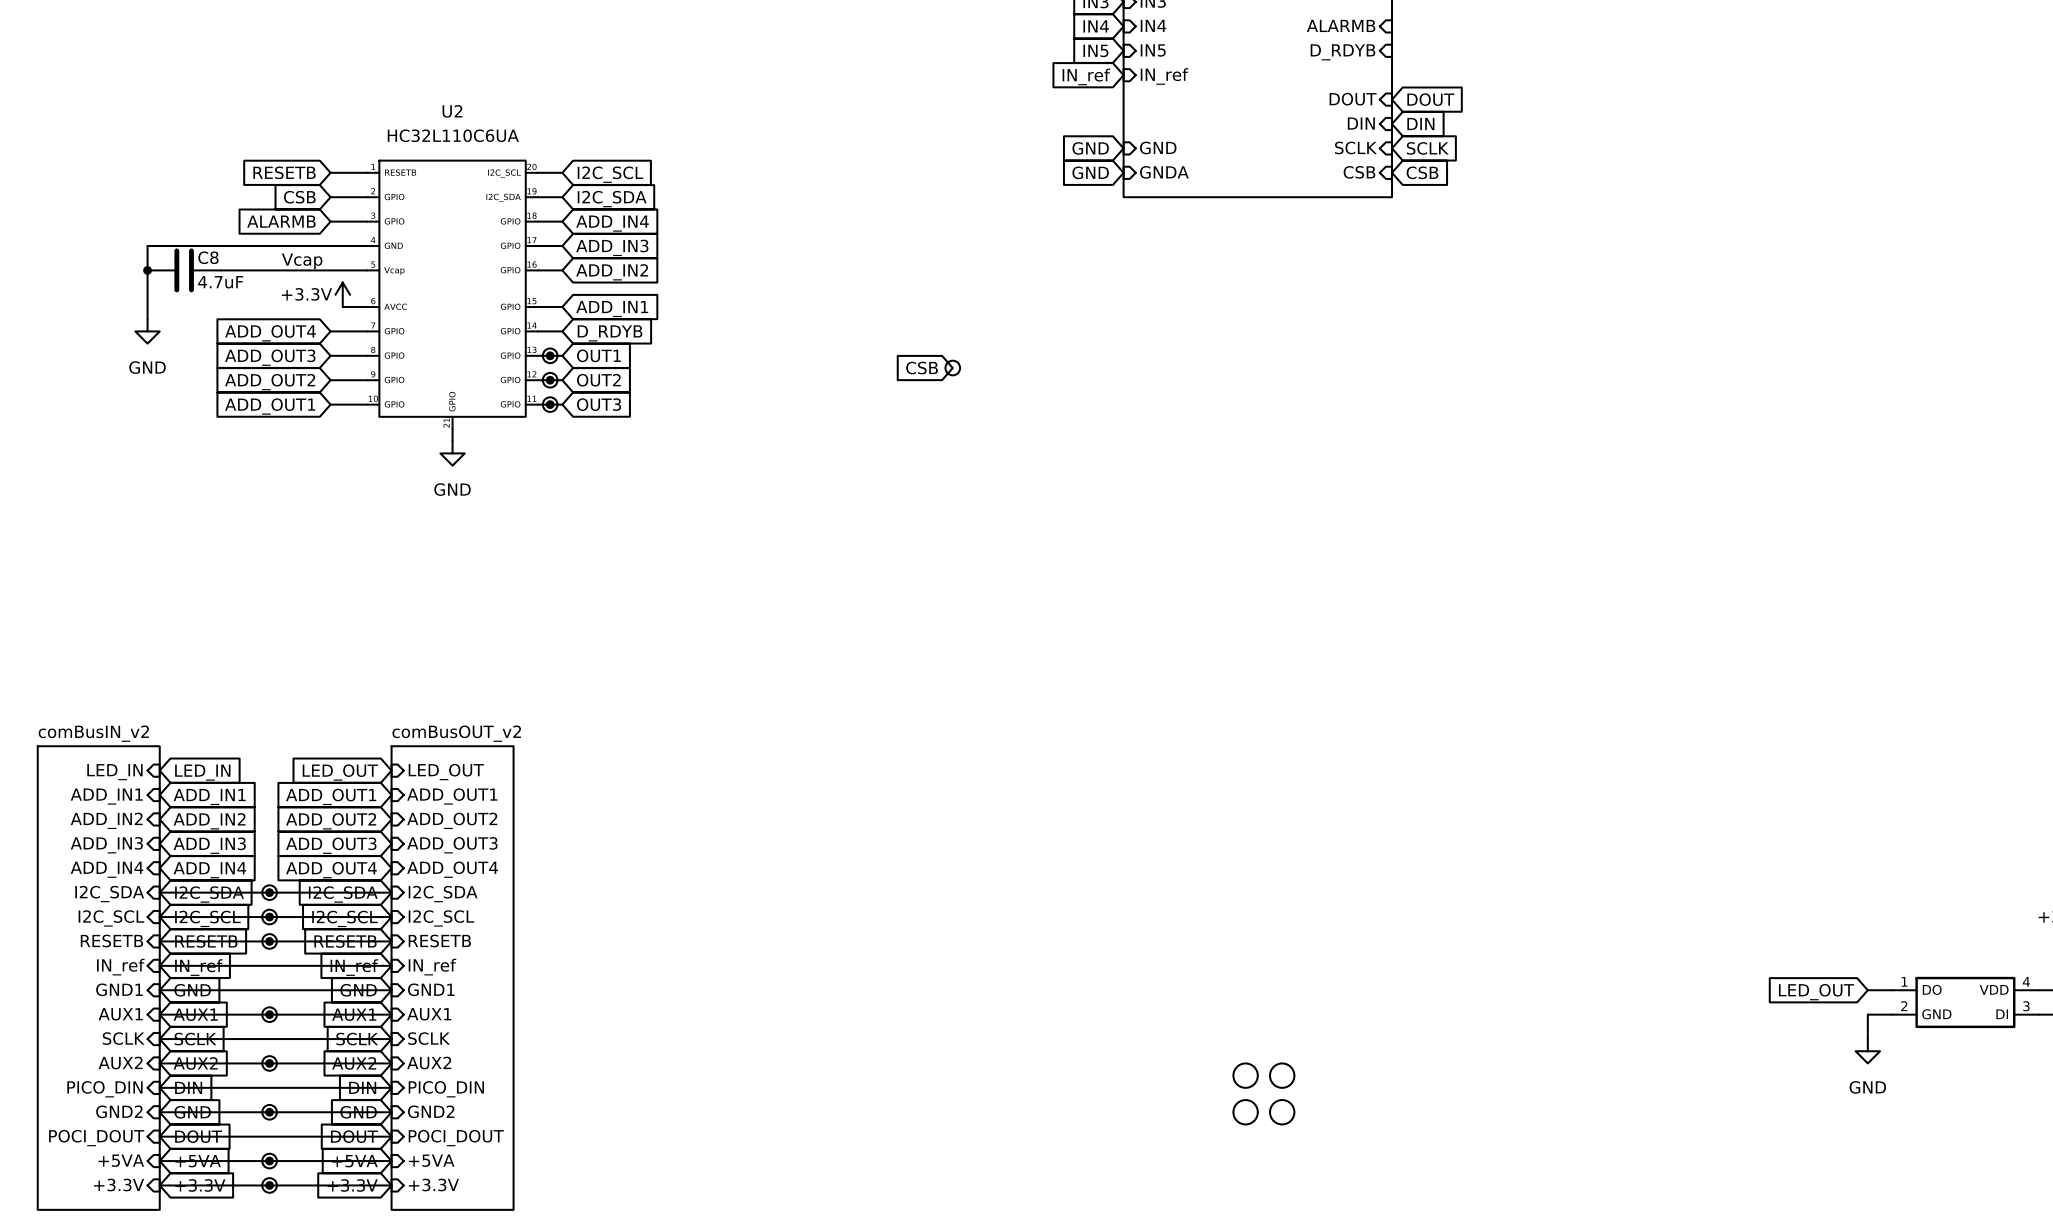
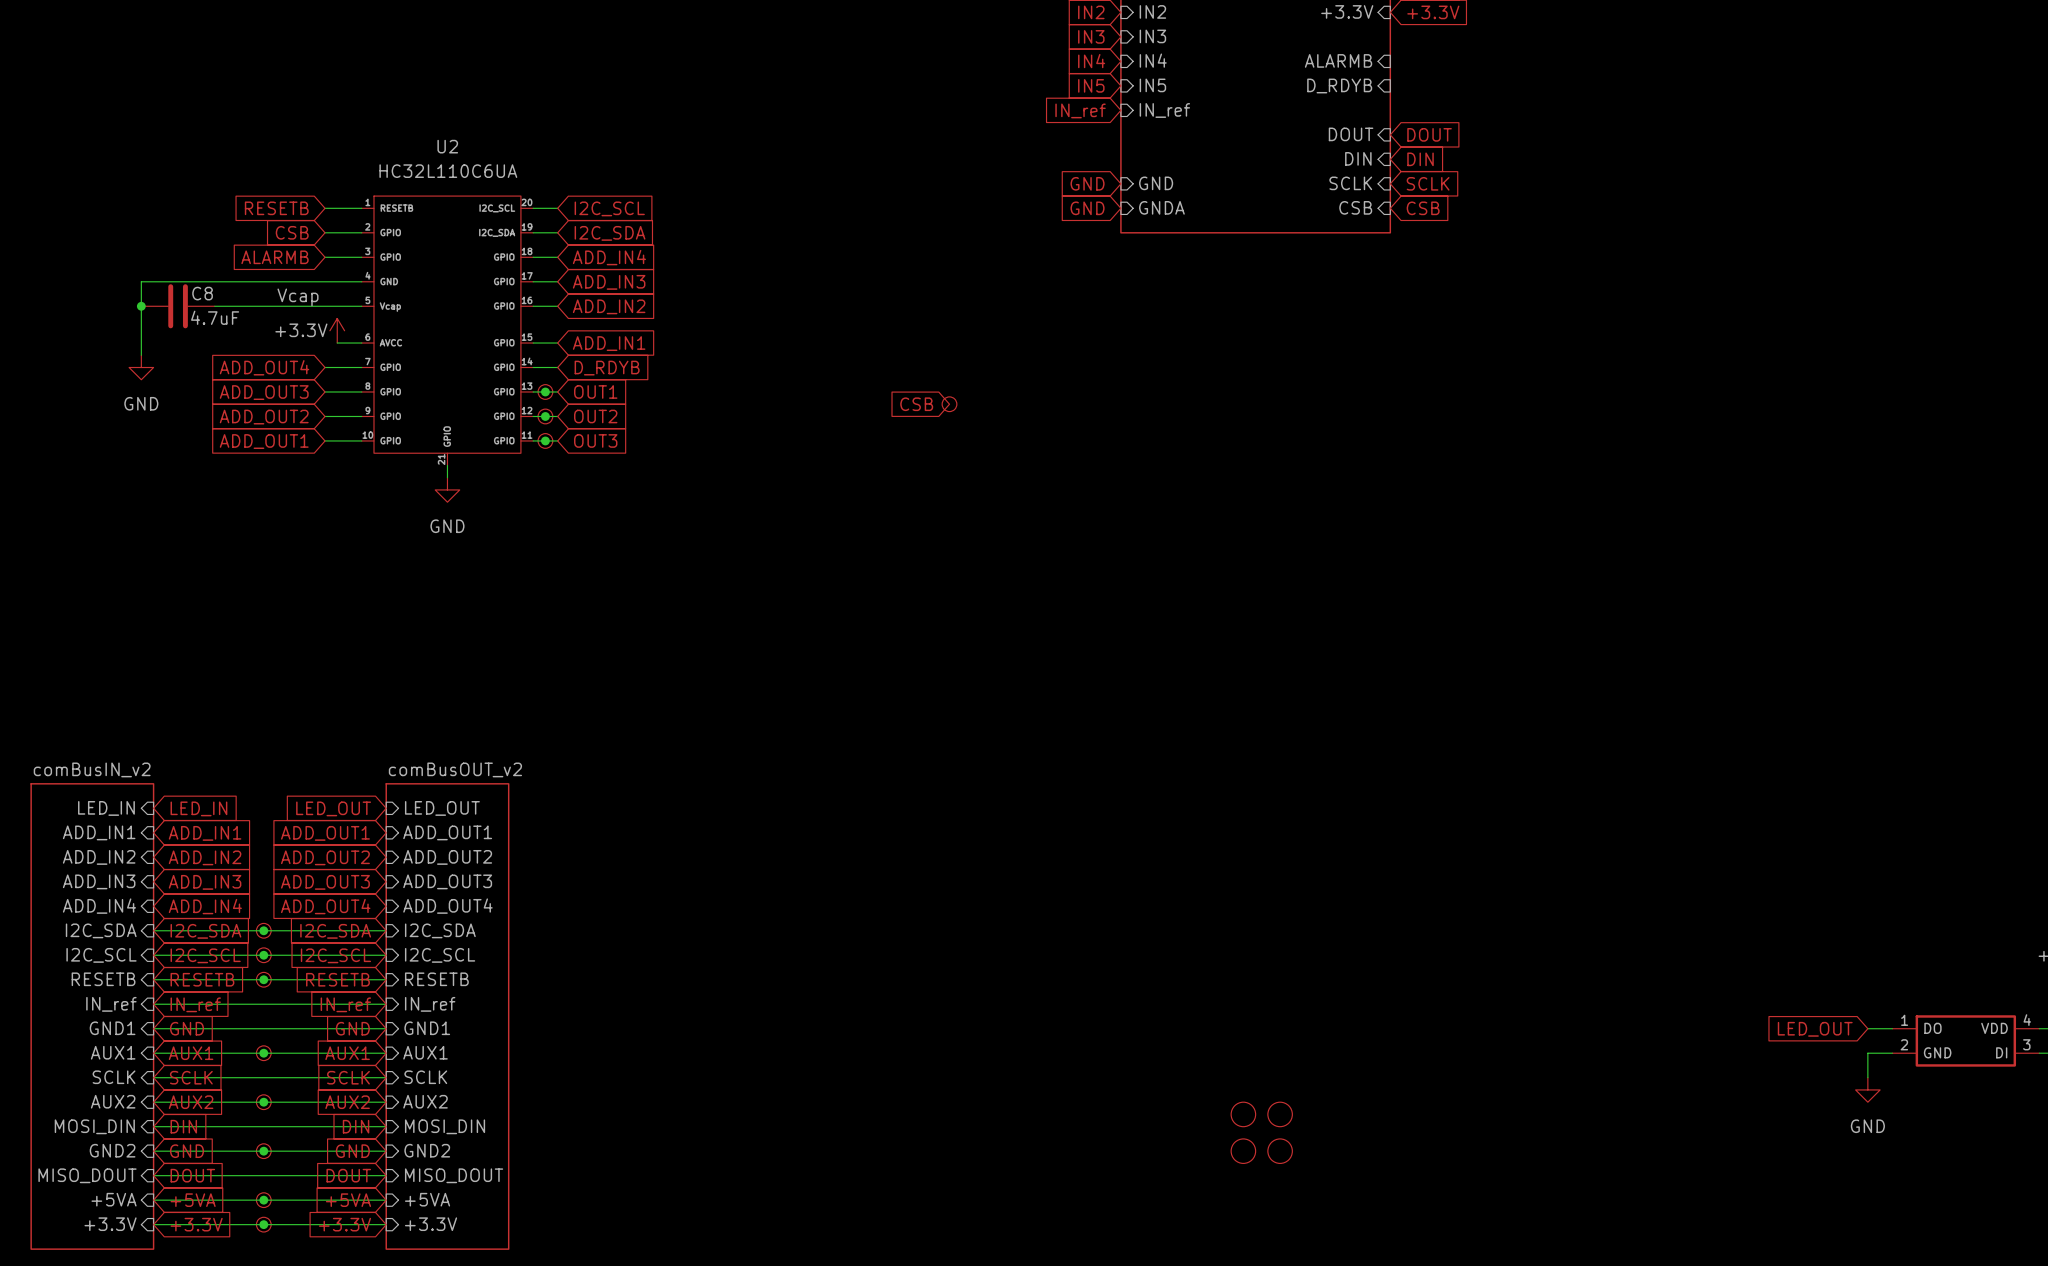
sheet pin: PICO_DIN (104, 1089) -> MOSI_DIN (94, 1126)
sheet pin: PICO_DIN (446, 1089) -> MOSI_DIN (445, 1126)
sheet pin: POCI_DOUT (96, 1138) -> MISO_DOUT (87, 1175)
sheet pin: POCI_DOUT (456, 1138) -> MISO_DOUT (454, 1175)

